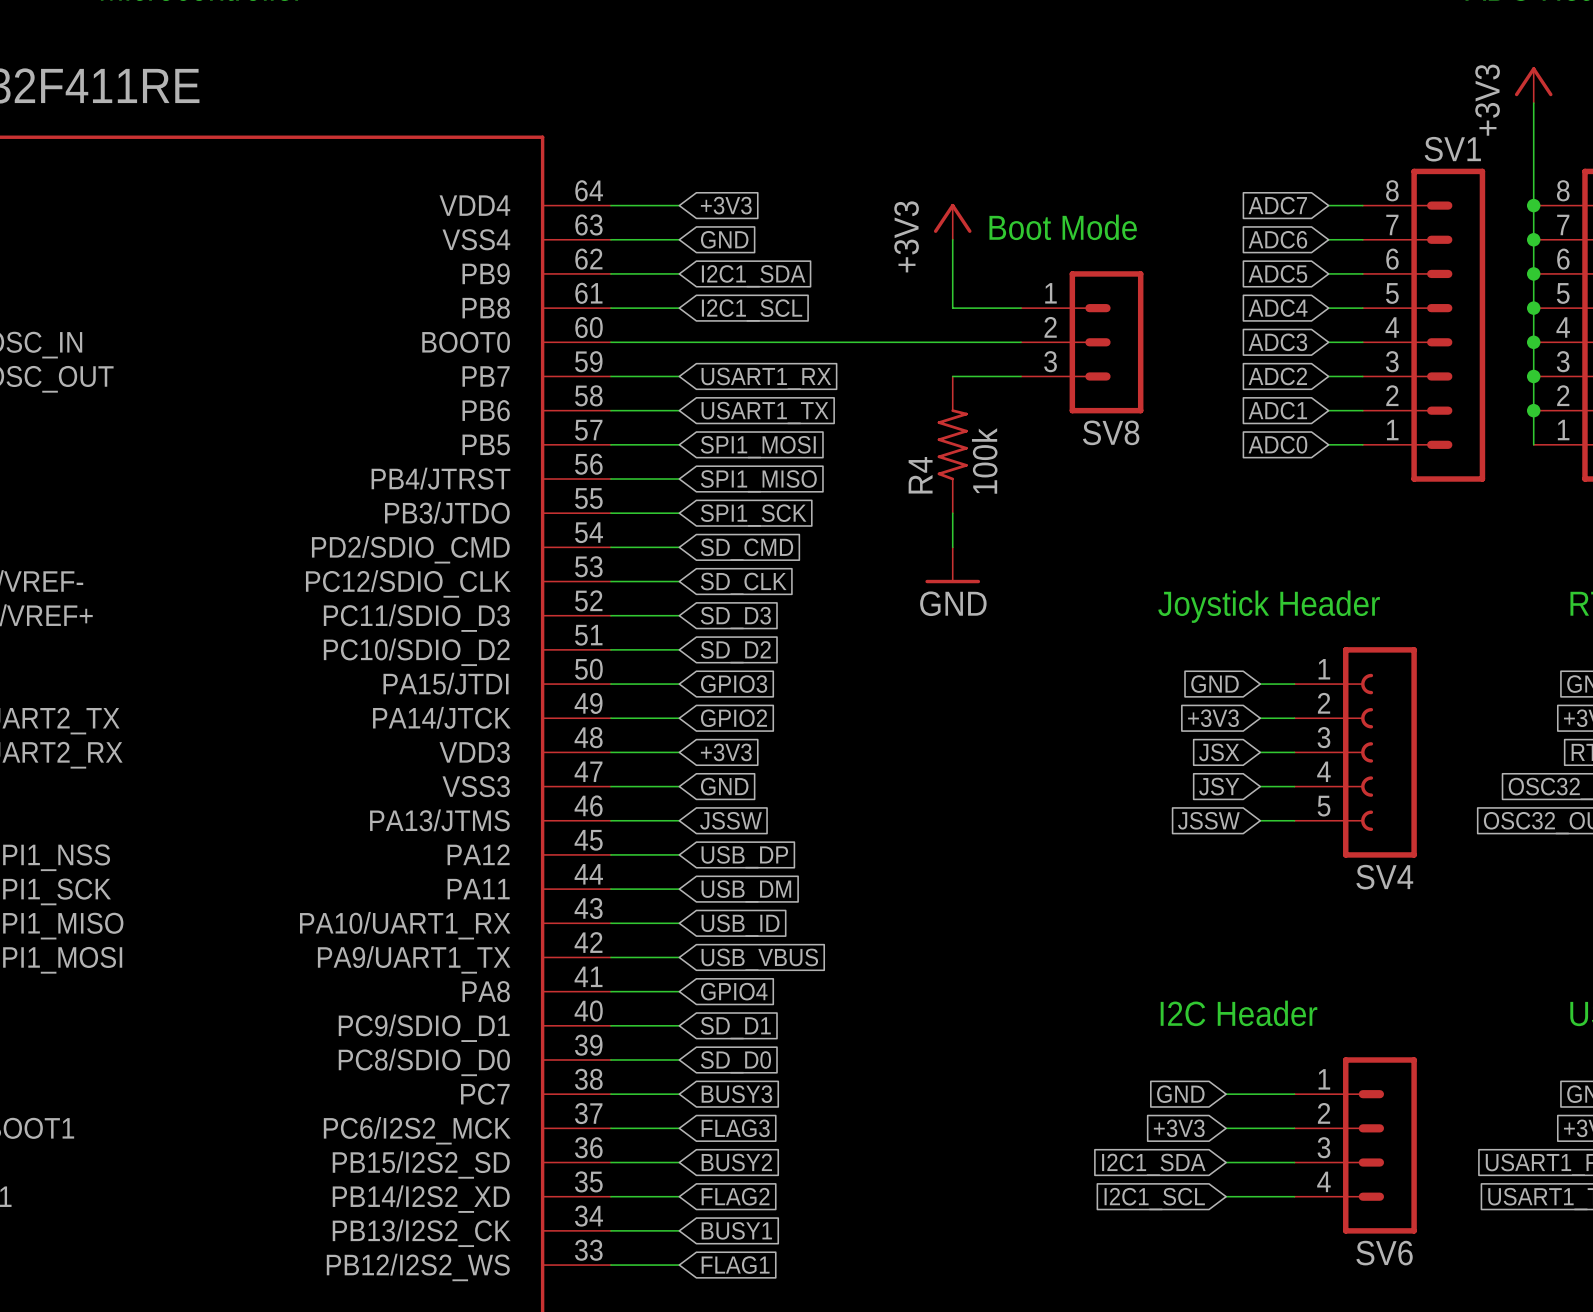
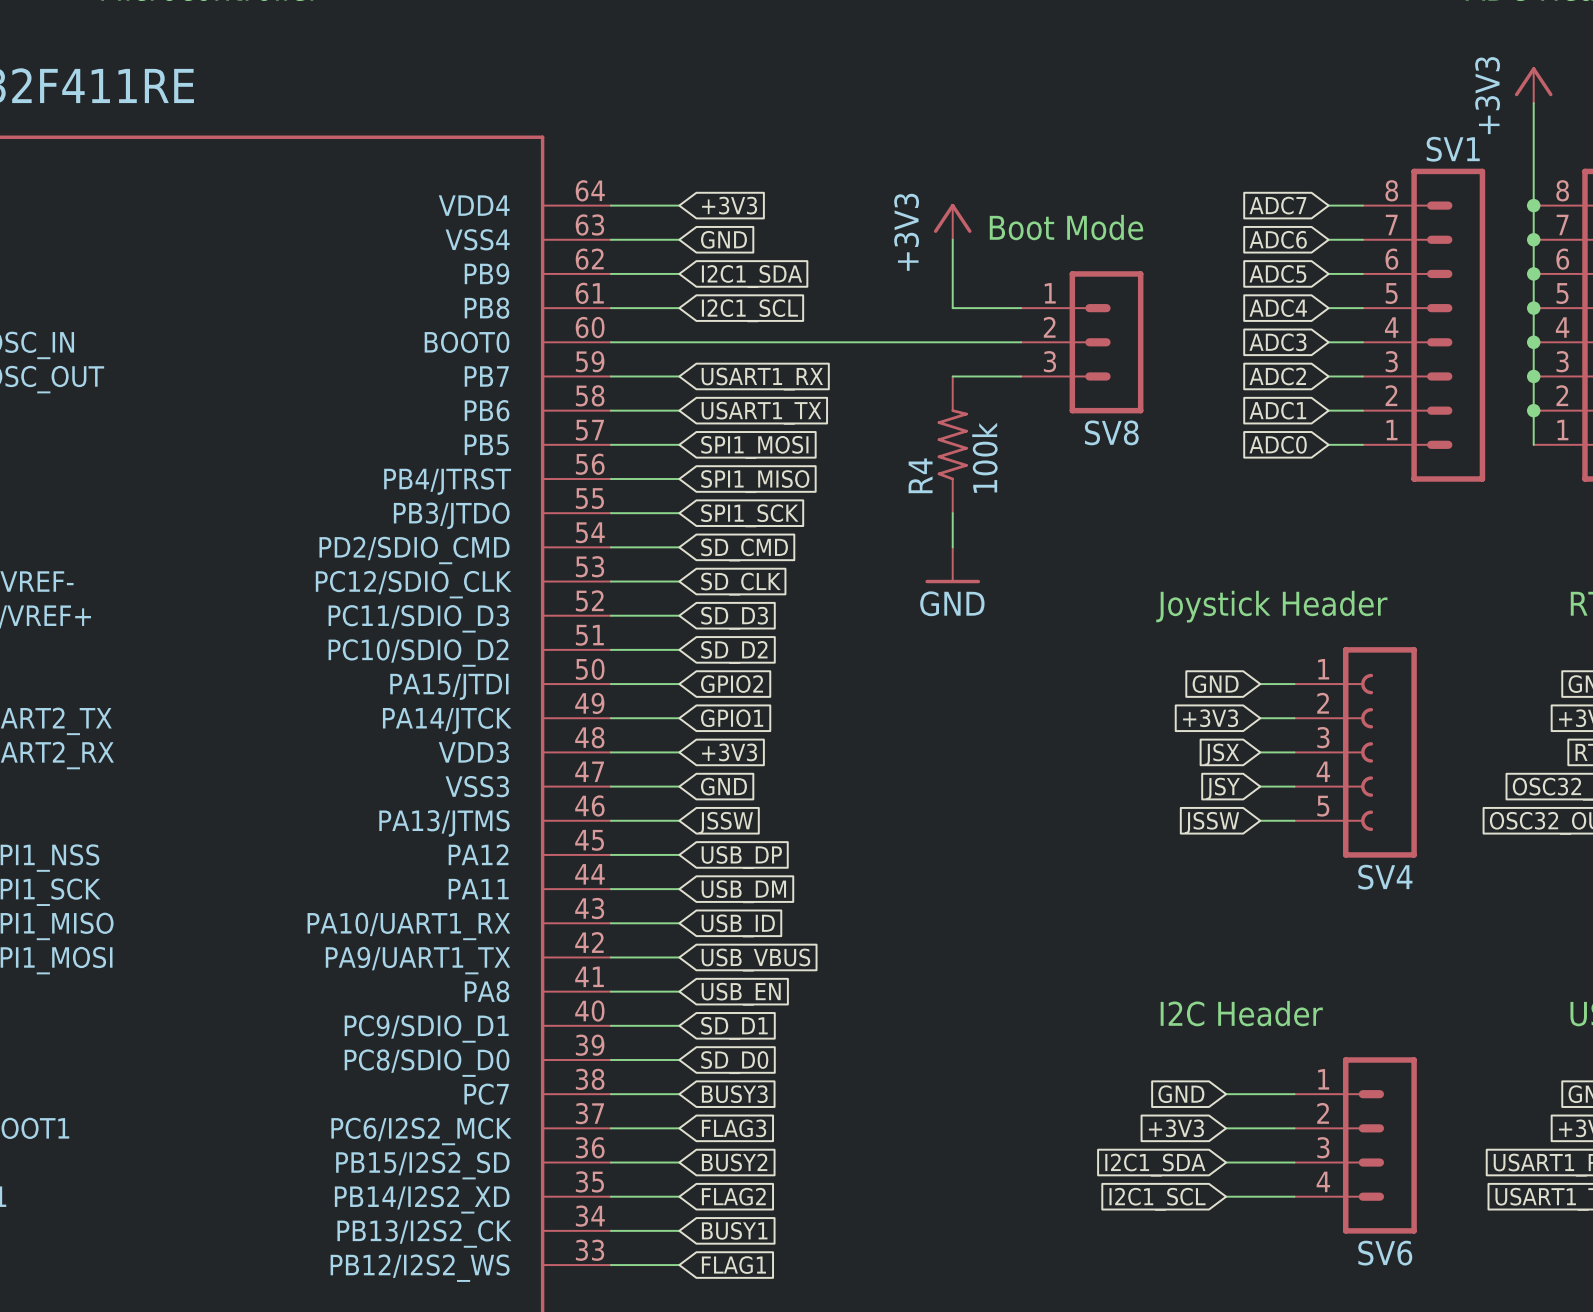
global label: GPIO3 (734, 684) -> GPIO2 (732, 684)
global label: GPIO2 (733, 718) -> GPIO1 (732, 718)
global label: GPIO4 (734, 991) -> USB_EN (741, 994)

